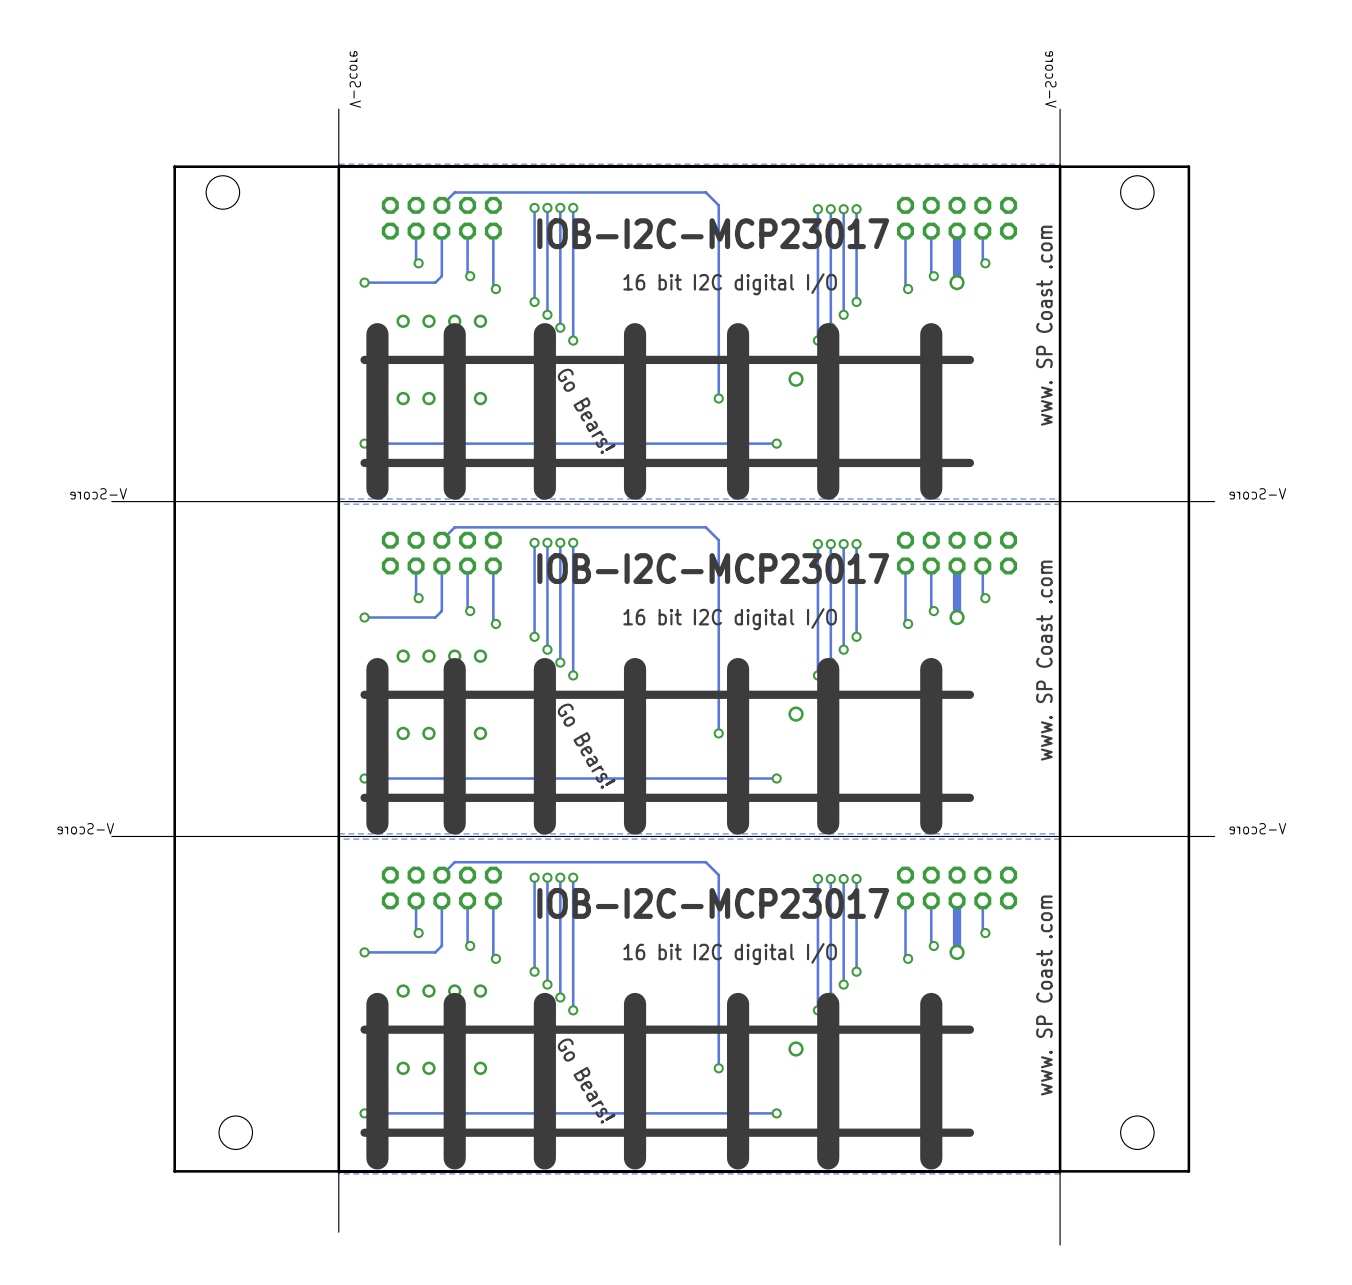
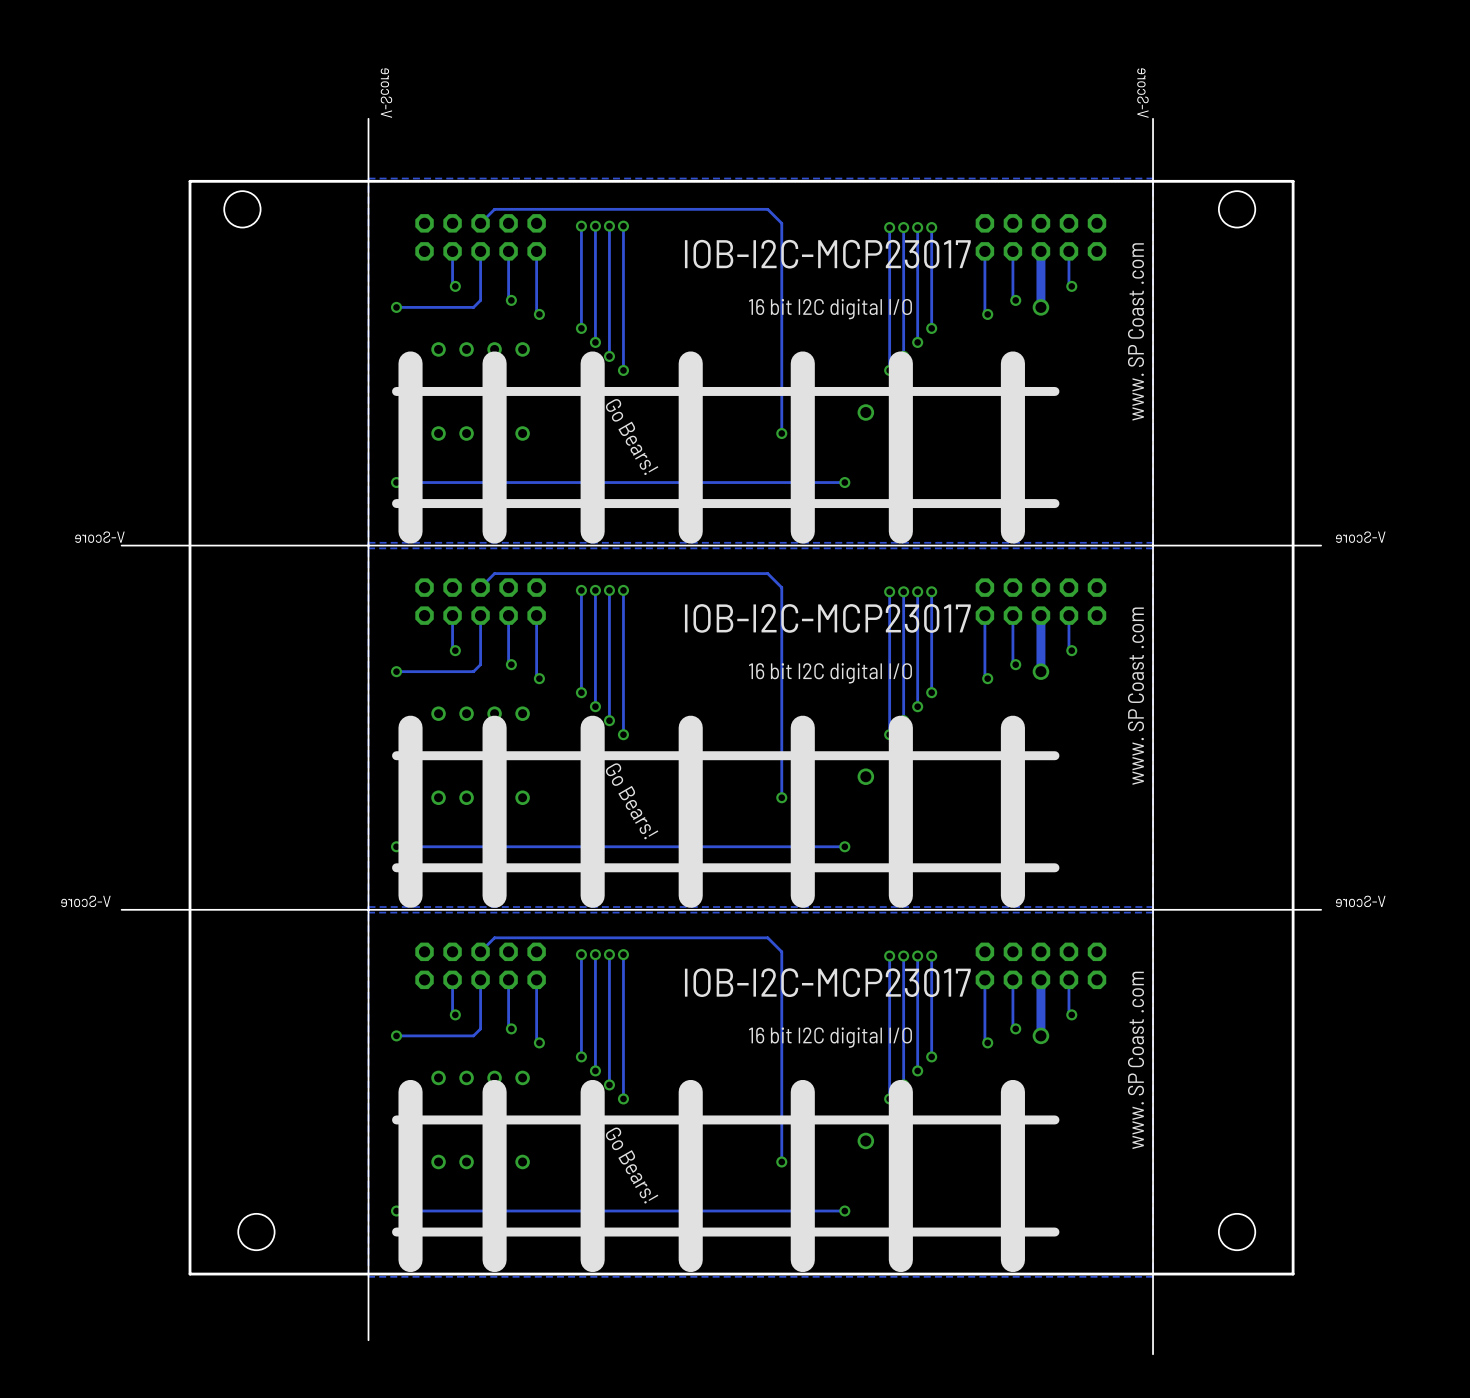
board edge: (1060, 166) (338, 166) (338, 1171) (1060, 1171) (1060, 166) -> none

